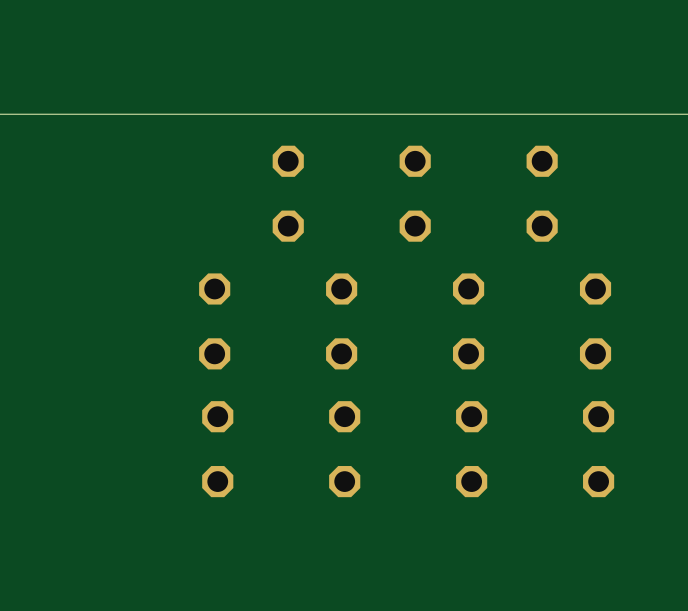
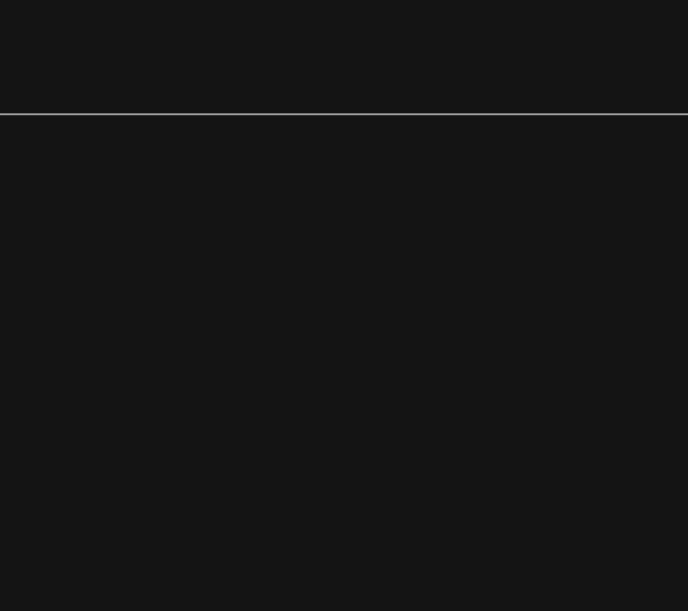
part: (288, 193) -> none
part: (415, 193) -> none
part: (542, 193) -> none
part: (214, 321) -> none
part: (341, 321) -> none
part: (468, 321) -> none
part: (595, 321) -> none
part: (217, 449) -> none
part: (344, 449) -> none
part: (471, 449) -> none
part: (598, 449) -> none

